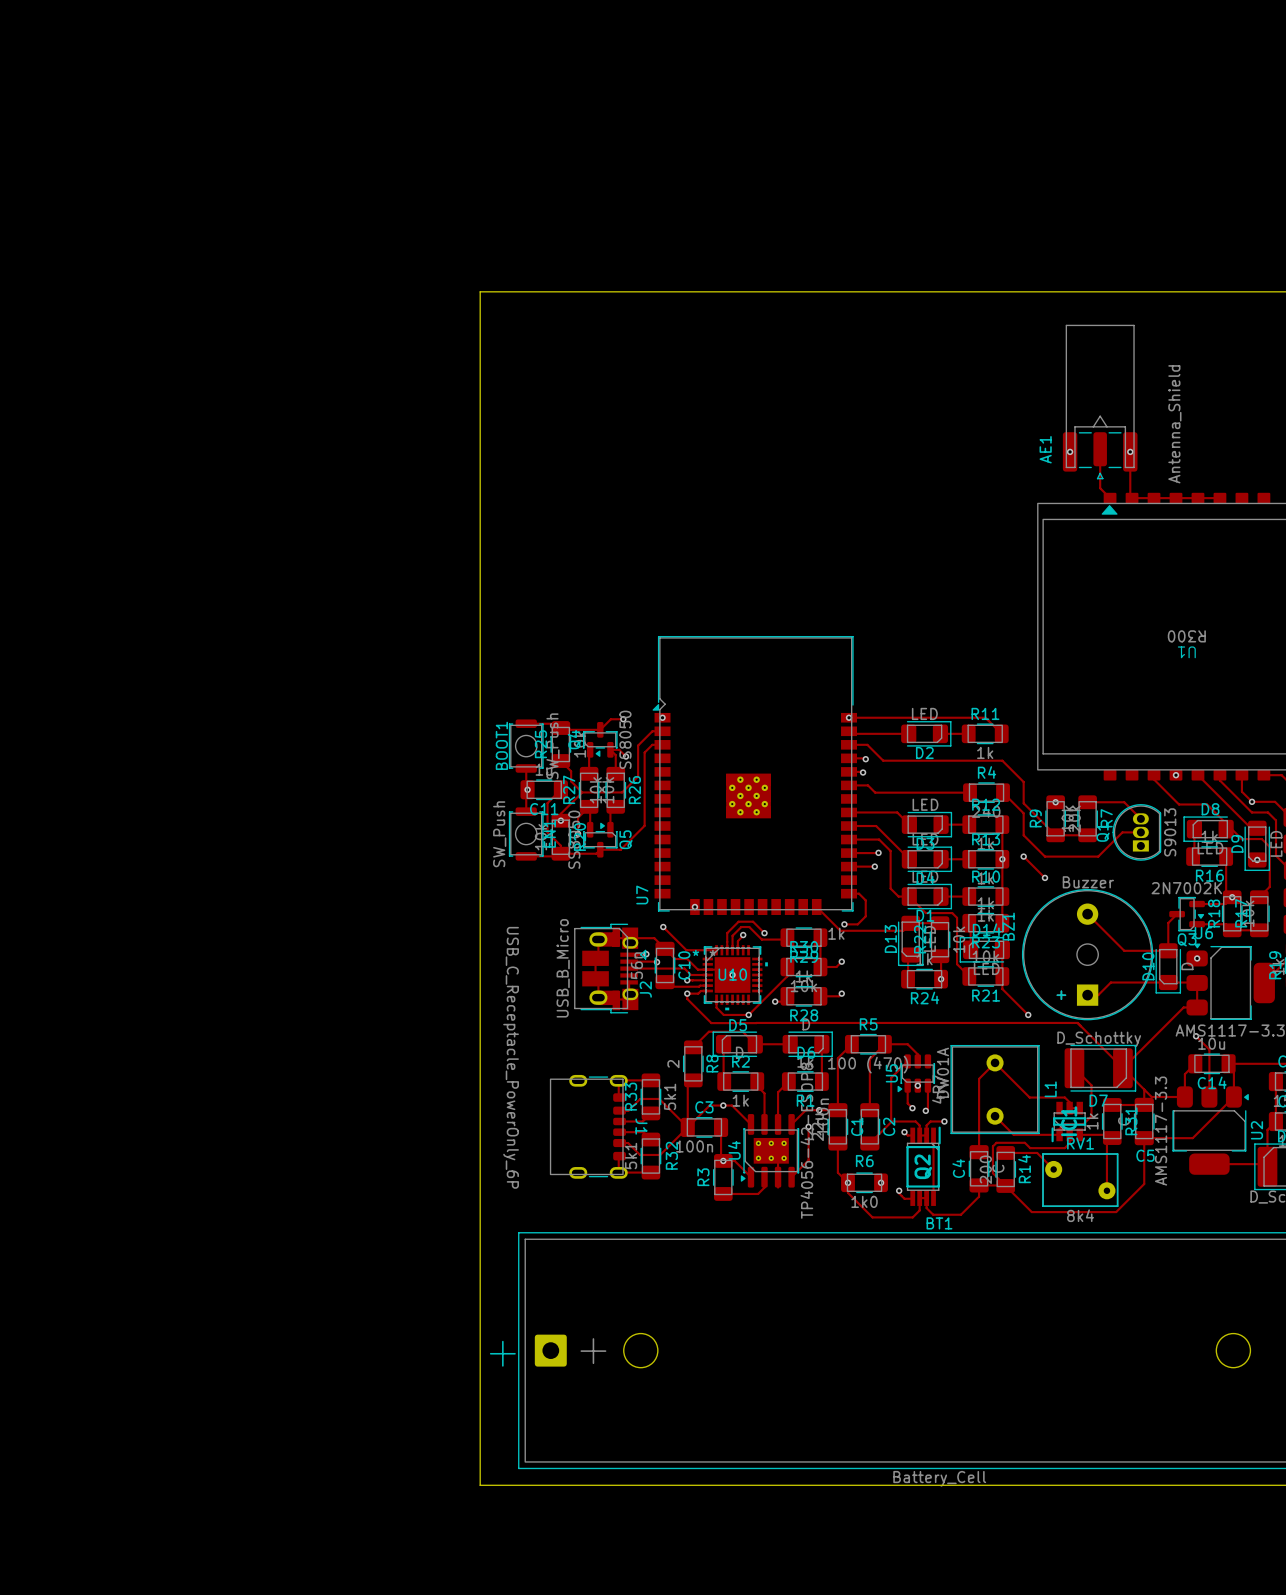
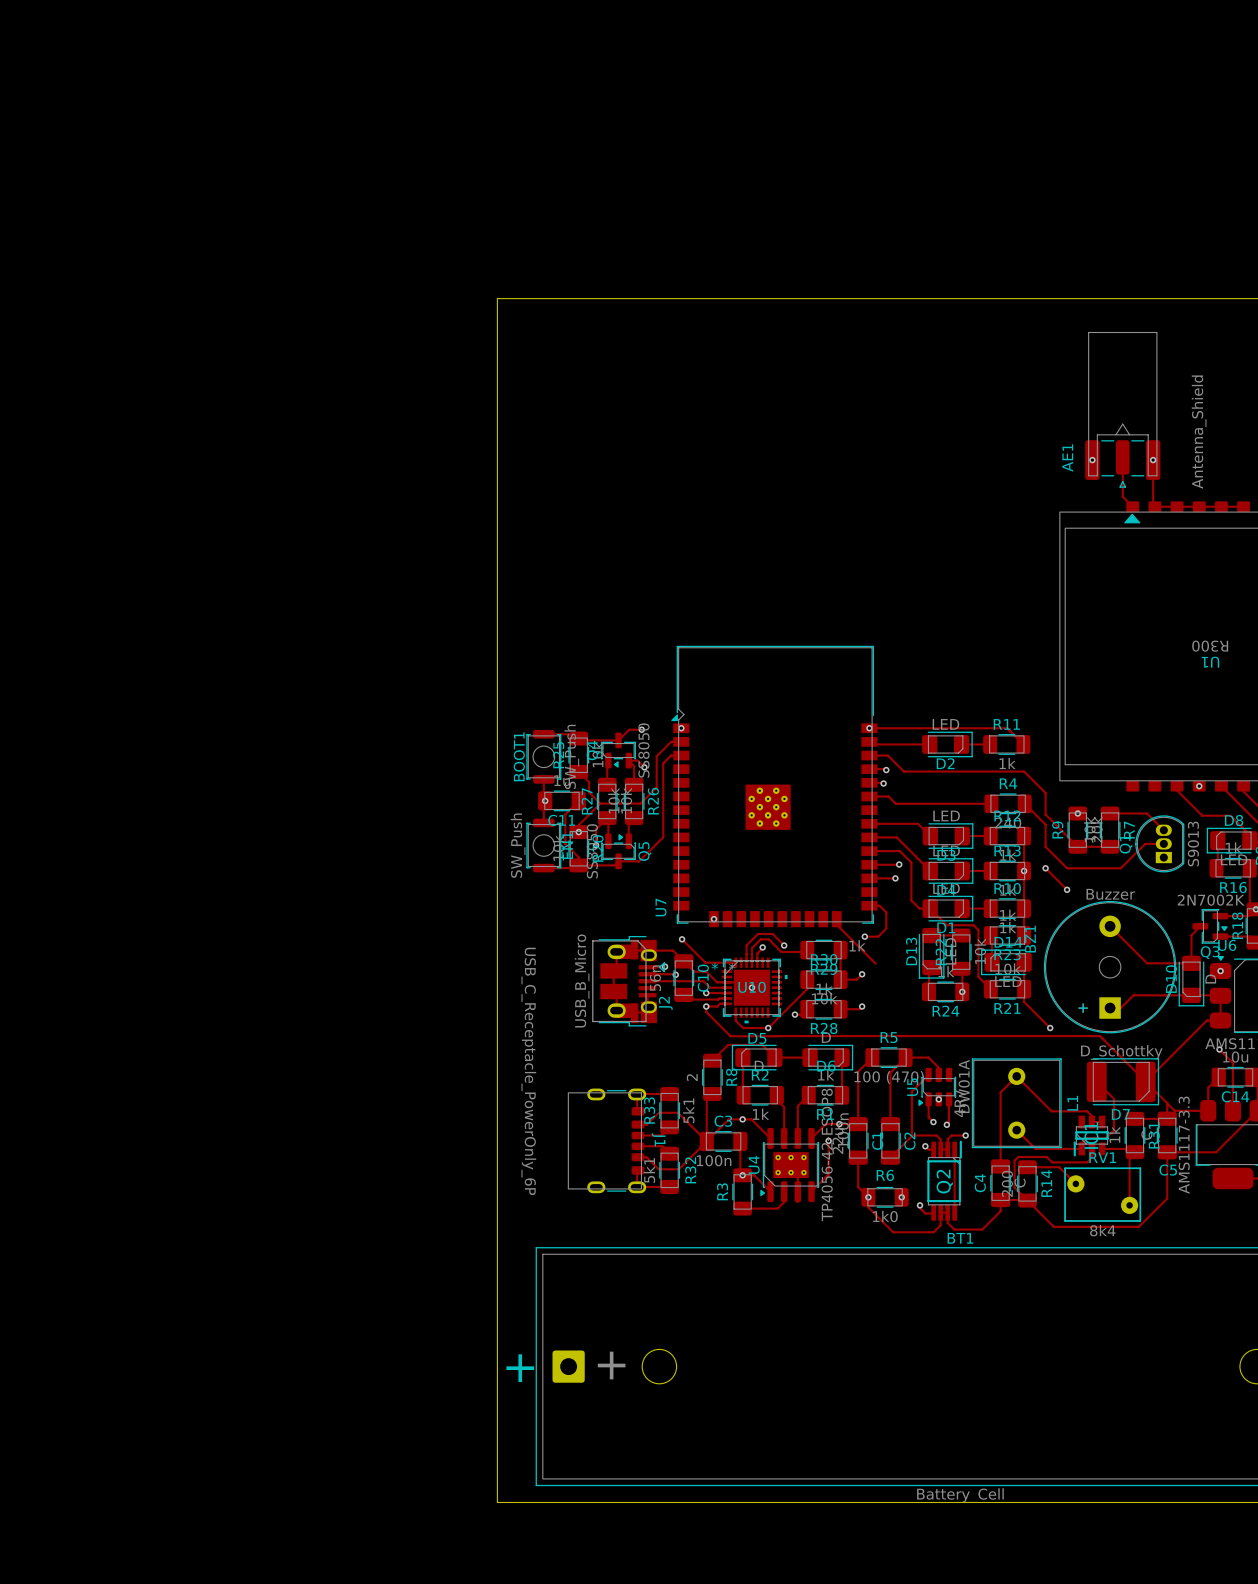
track: (816, 907) (840, 930) (903, 930) (910, 923) -> none
track: none -> (836, 924) (875, 963)

